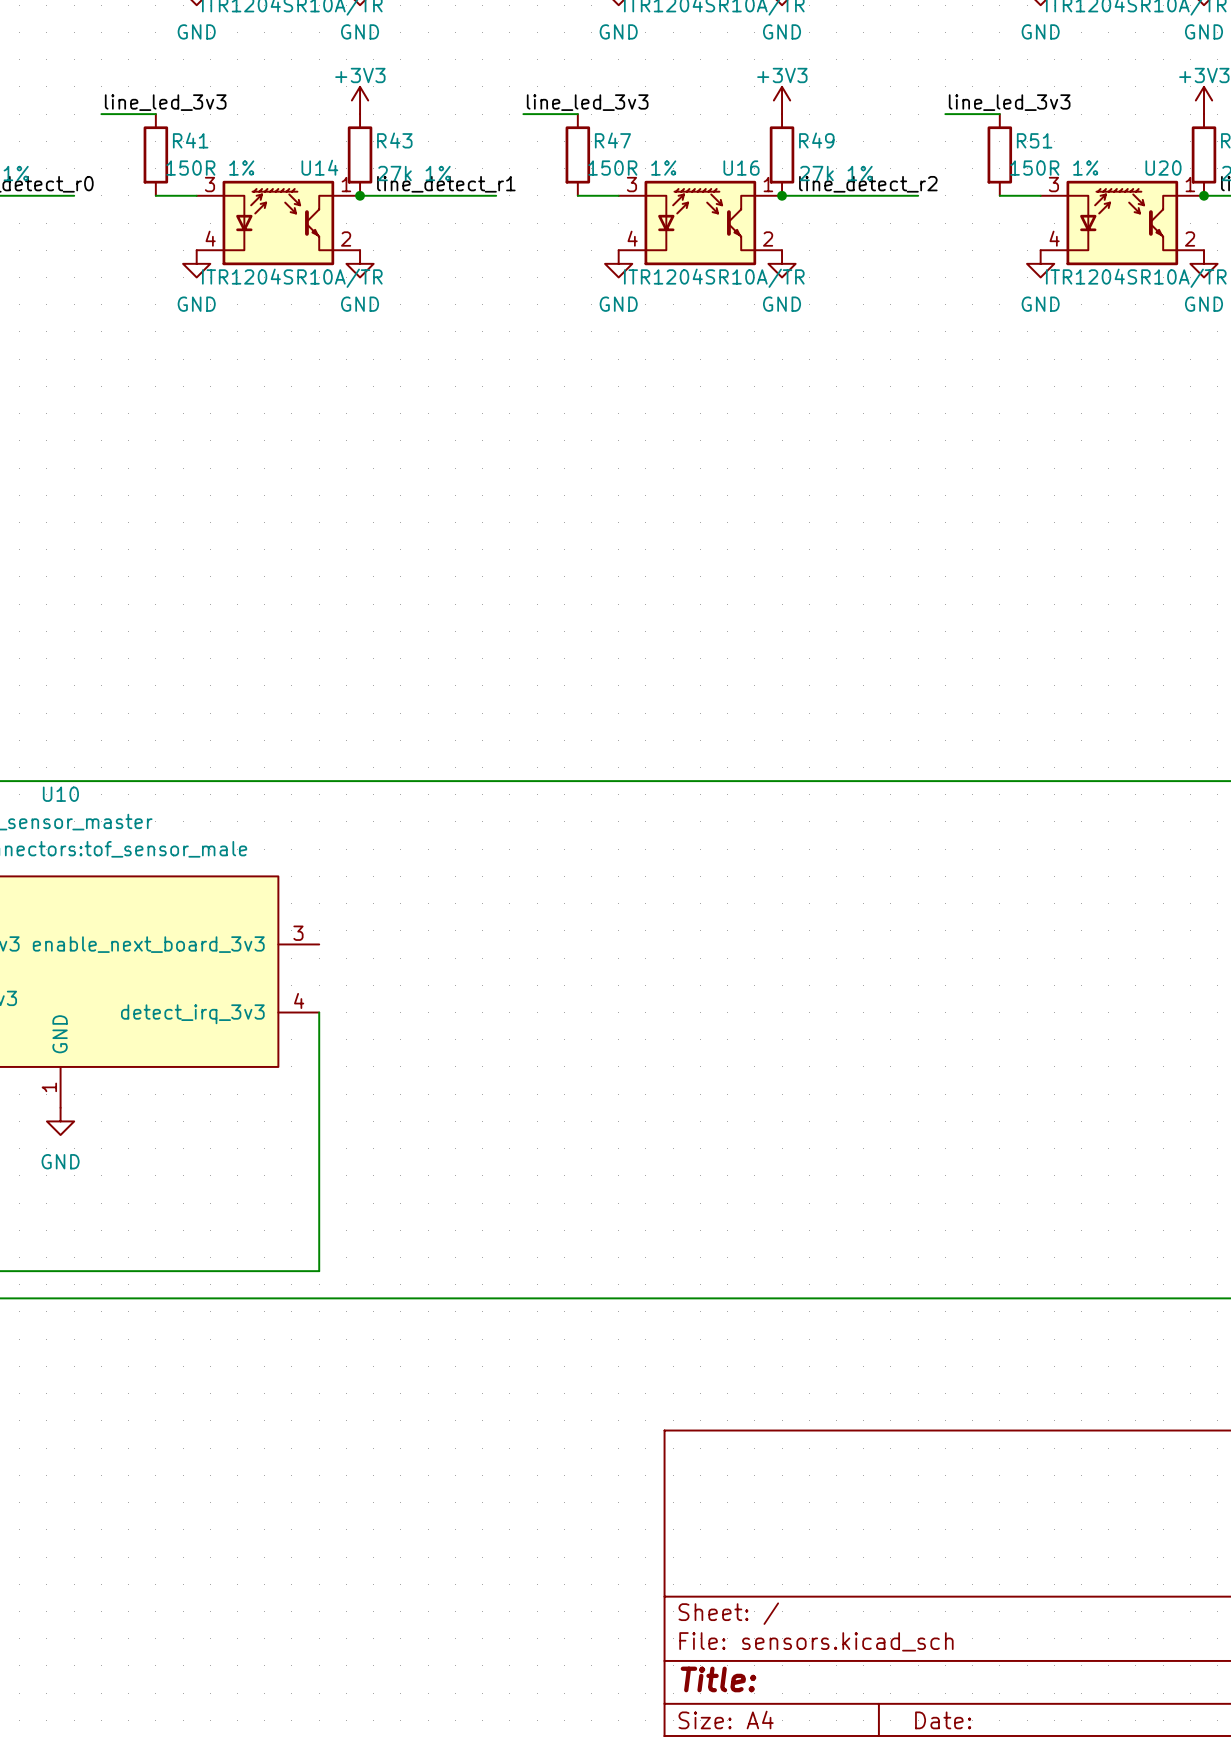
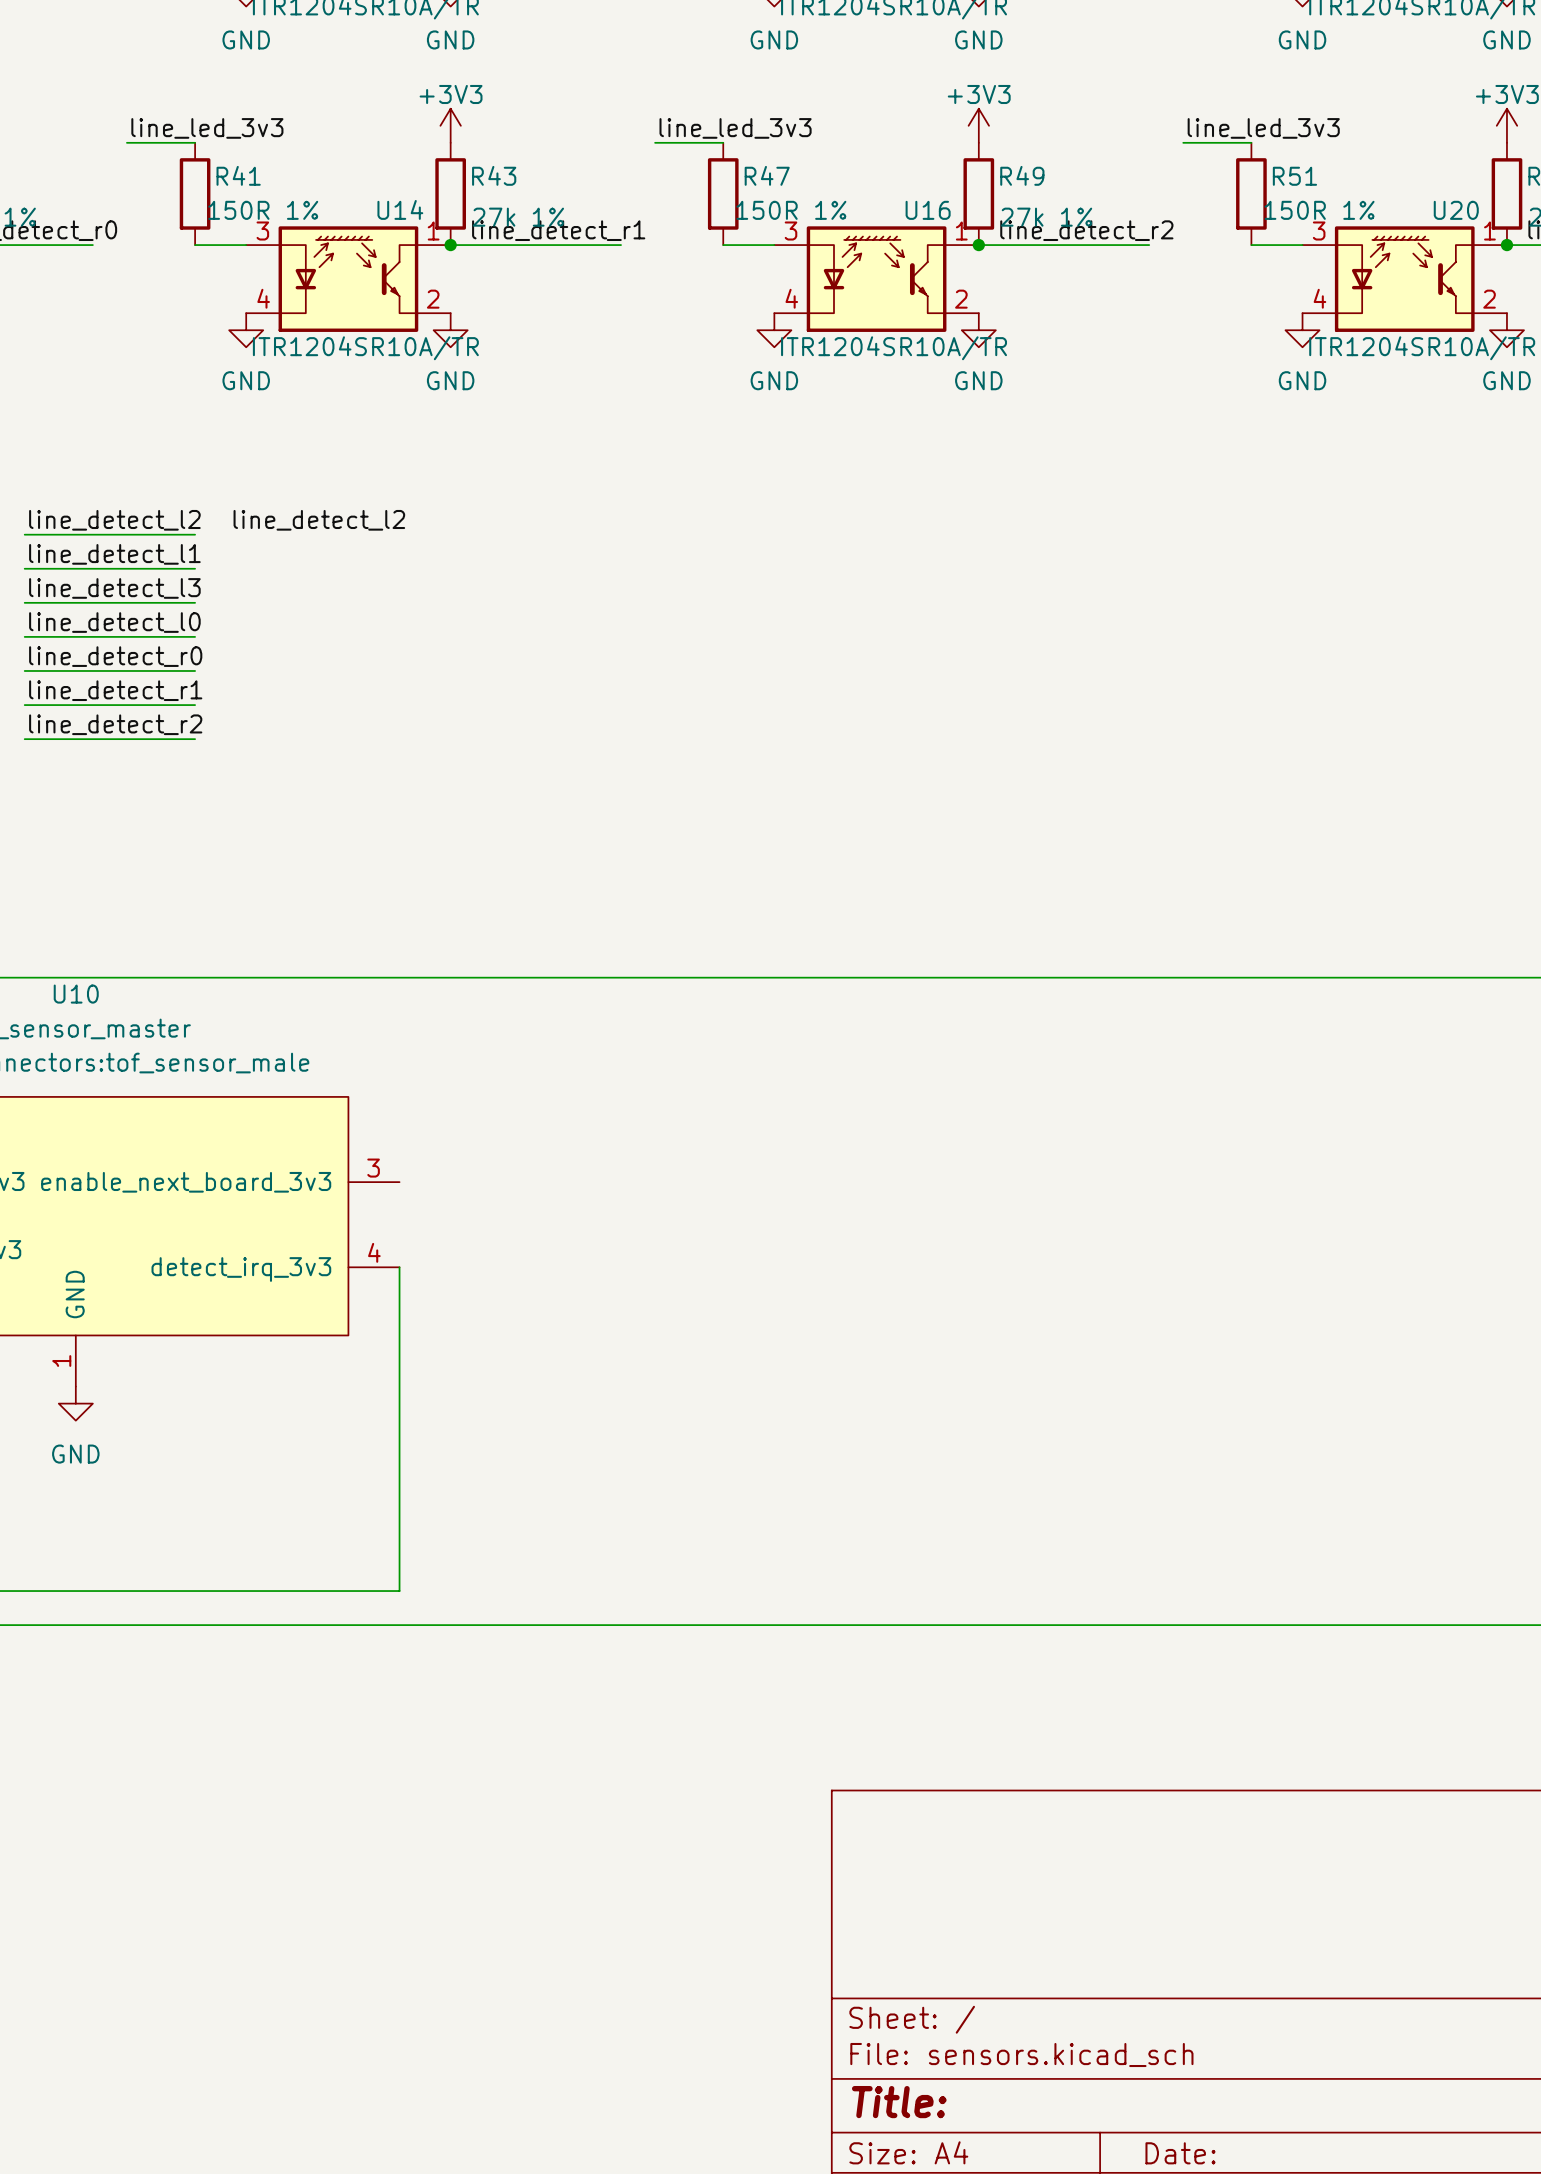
label: none -> line_detect_l2 (114, 520)
label: none -> line_detect_l2 (319, 520)
wire: none -> (24, 534) (195, 534)
label: none -> line_detect_l1 (114, 554)
wire: none -> (24, 568) (195, 568)
label: none -> line_detect_l3 (114, 588)
wire: none -> (24, 602) (195, 602)
label: none -> line_detect_l0 (114, 622)
wire: none -> (24, 636) (195, 636)
label: none -> line_detect_r0 (115, 656)
wire: none -> (24, 670) (195, 670)
label: none -> line_detect_r1 (115, 690)
wire: none -> (24, 705) (195, 705)
label: none -> line_detect_r2 (115, 724)
wire: none -> (24, 739) (195, 739)

